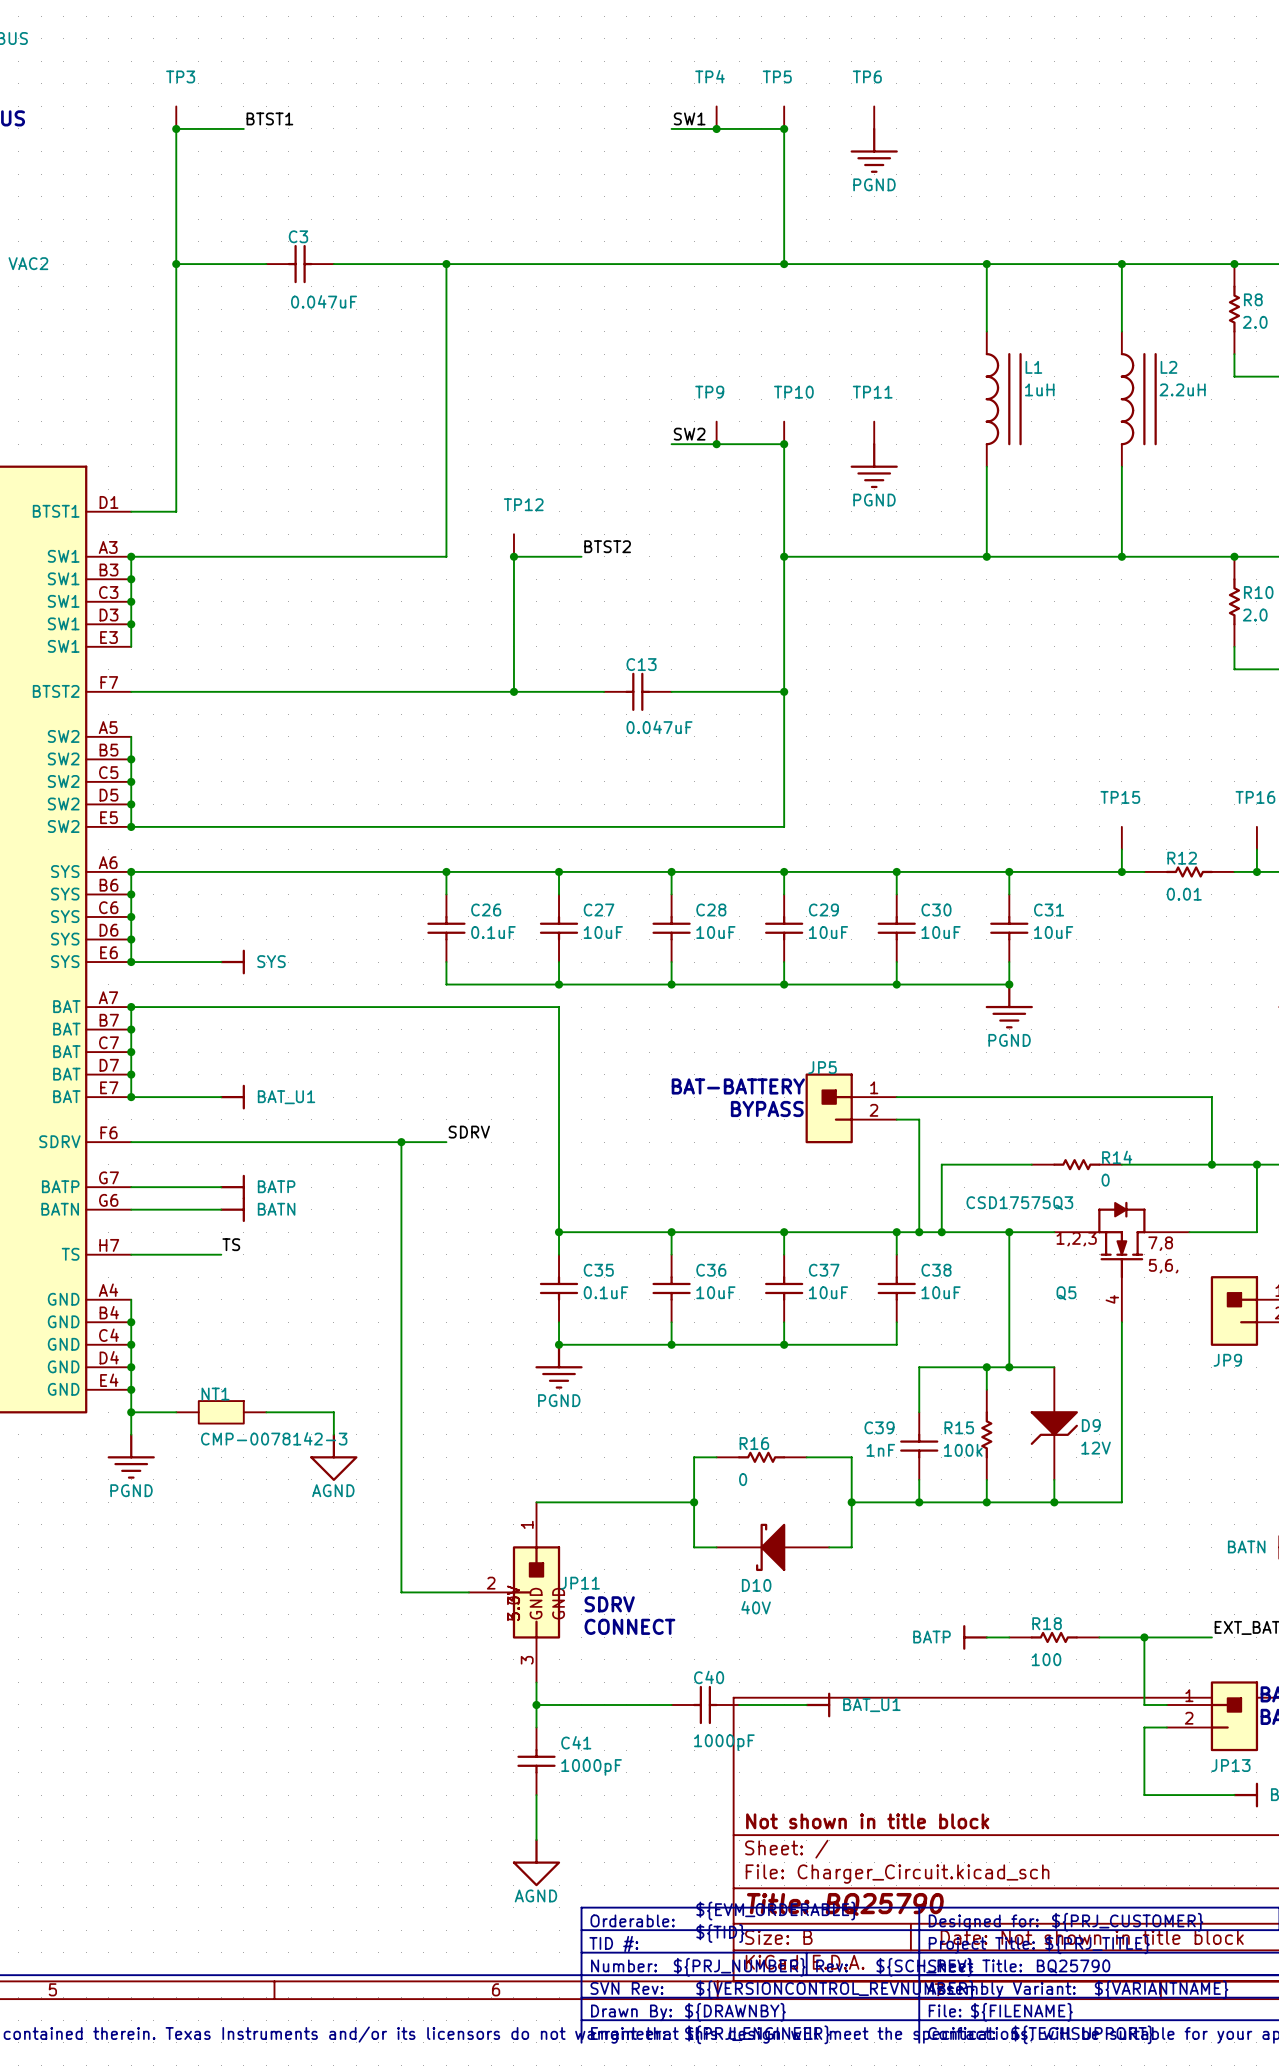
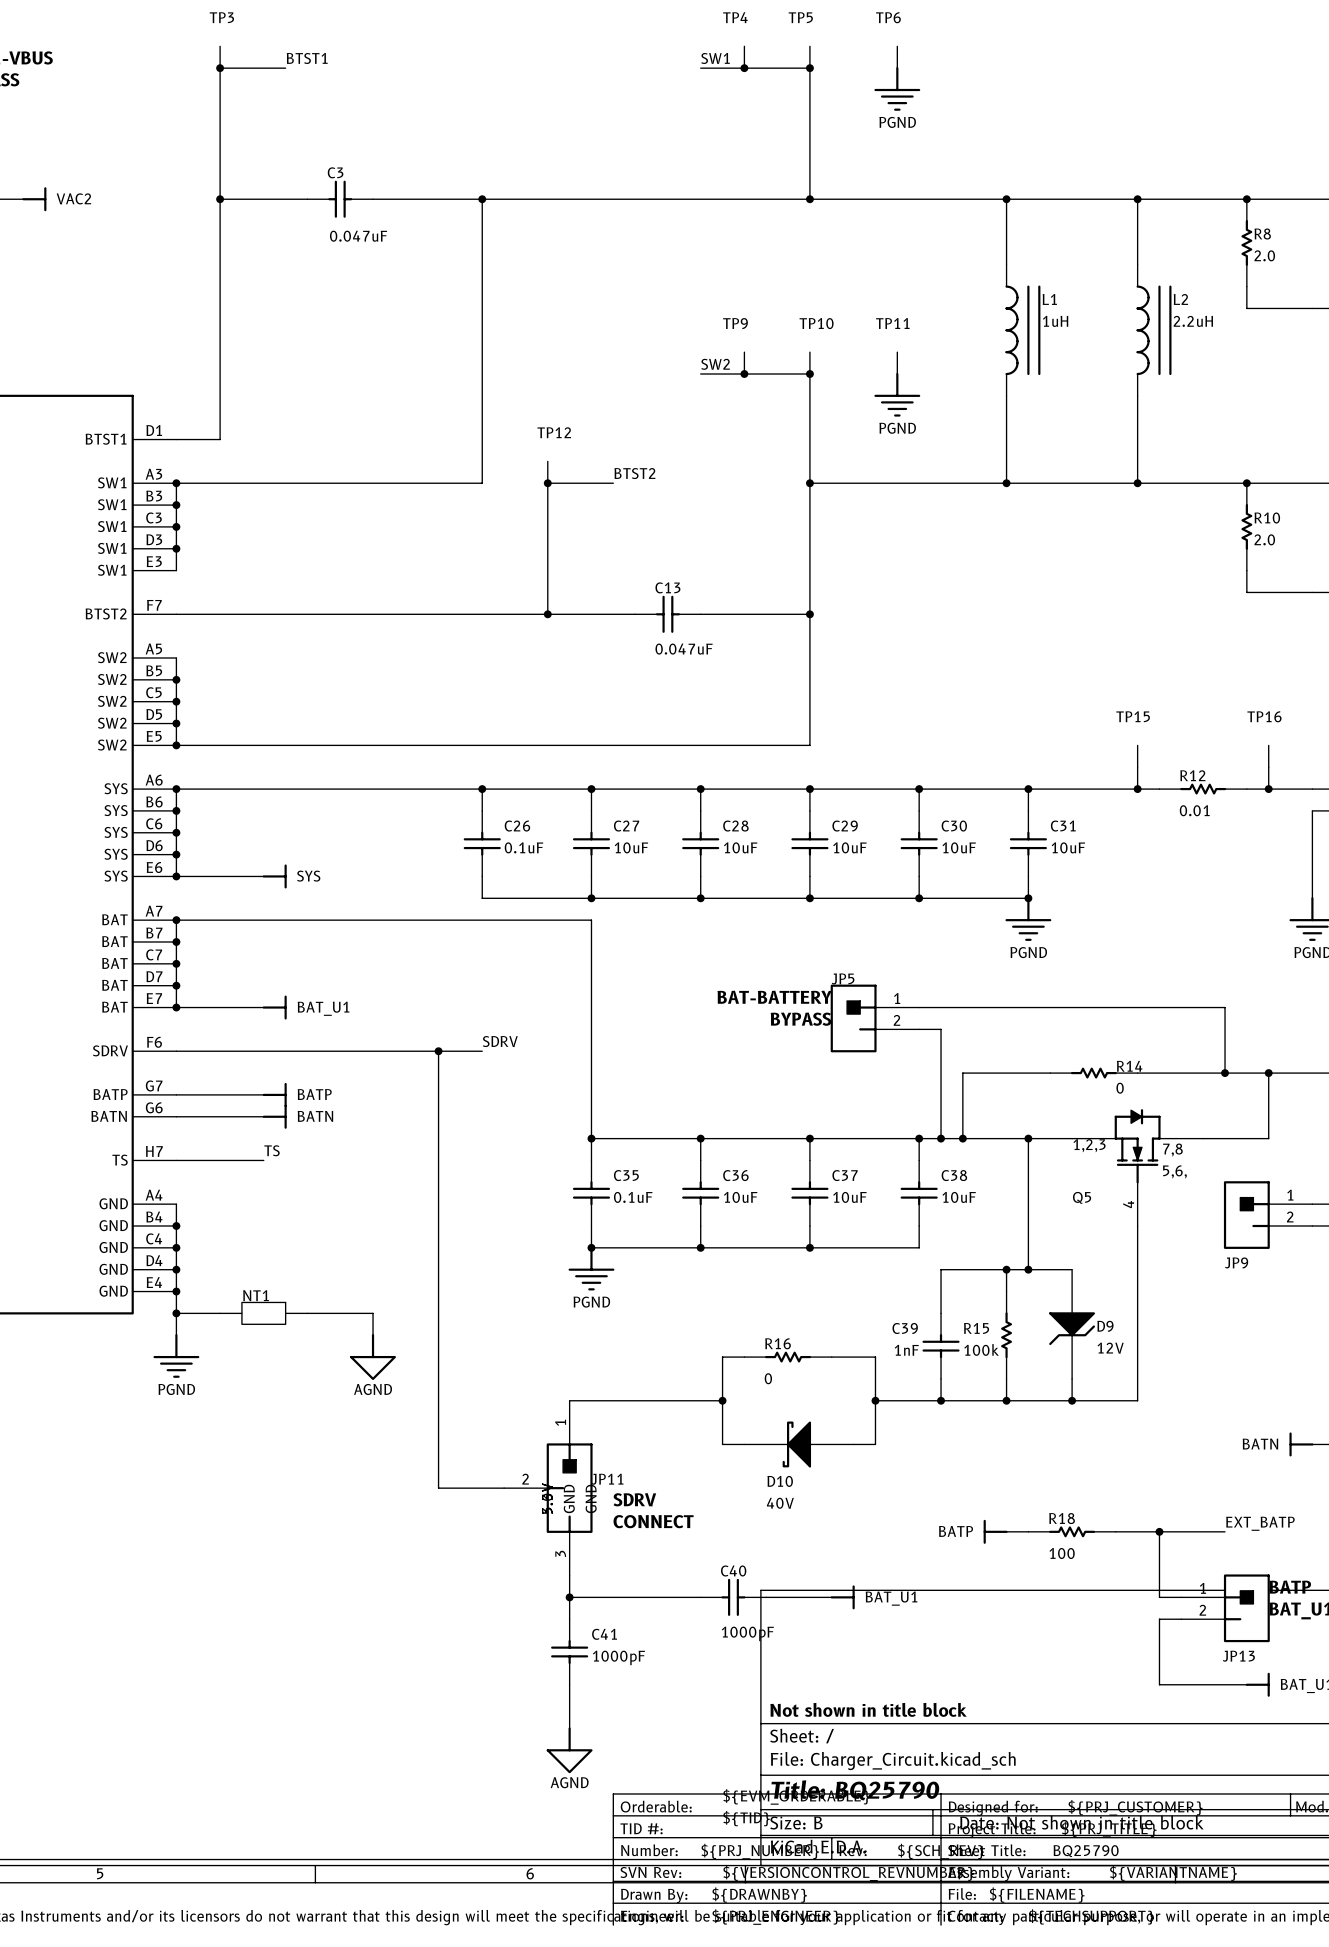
Q5 value: CSD17575Q3 (1019, 1203) -> none
NT1 value: CMP-0078142-3 (274, 1438) -> none

